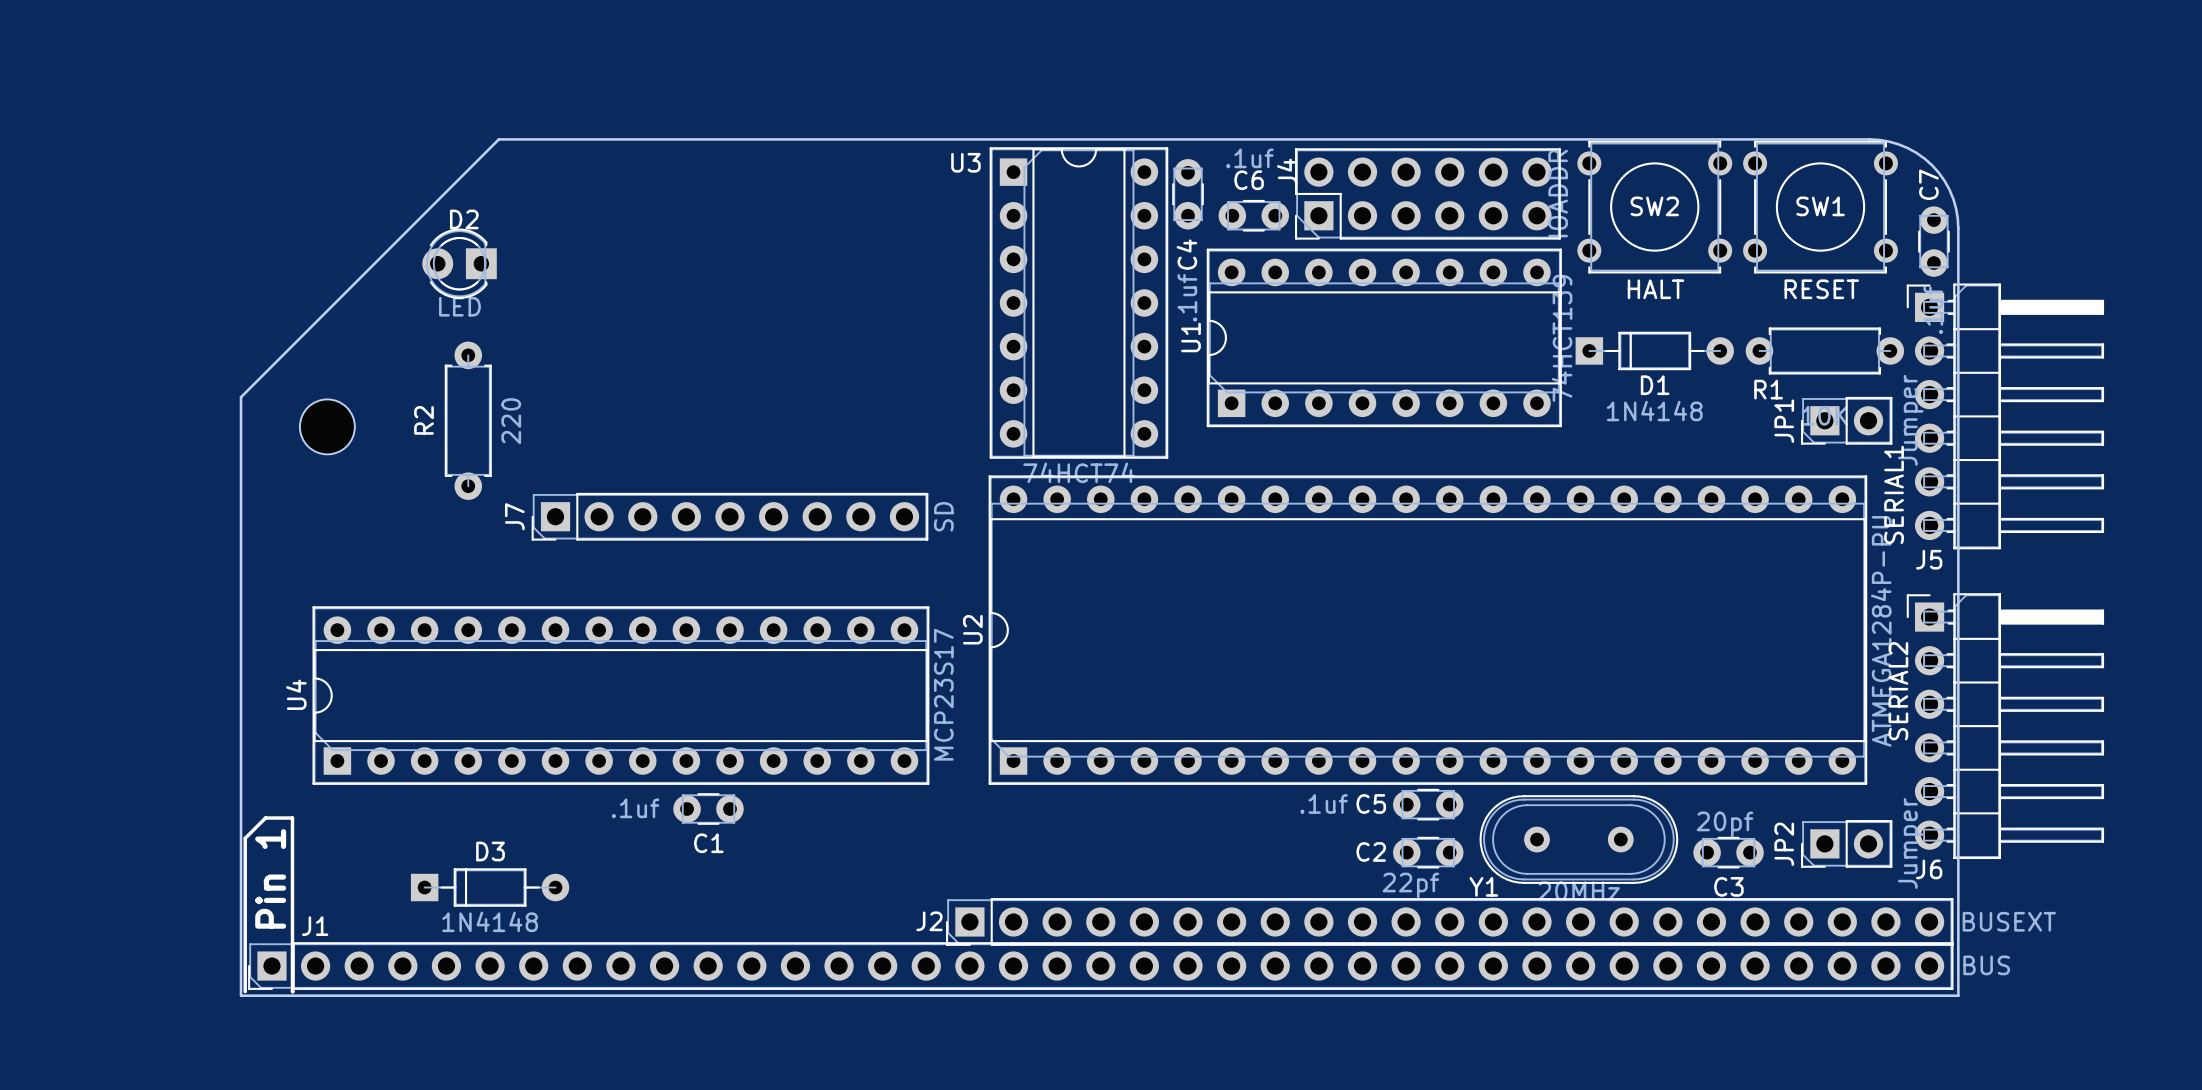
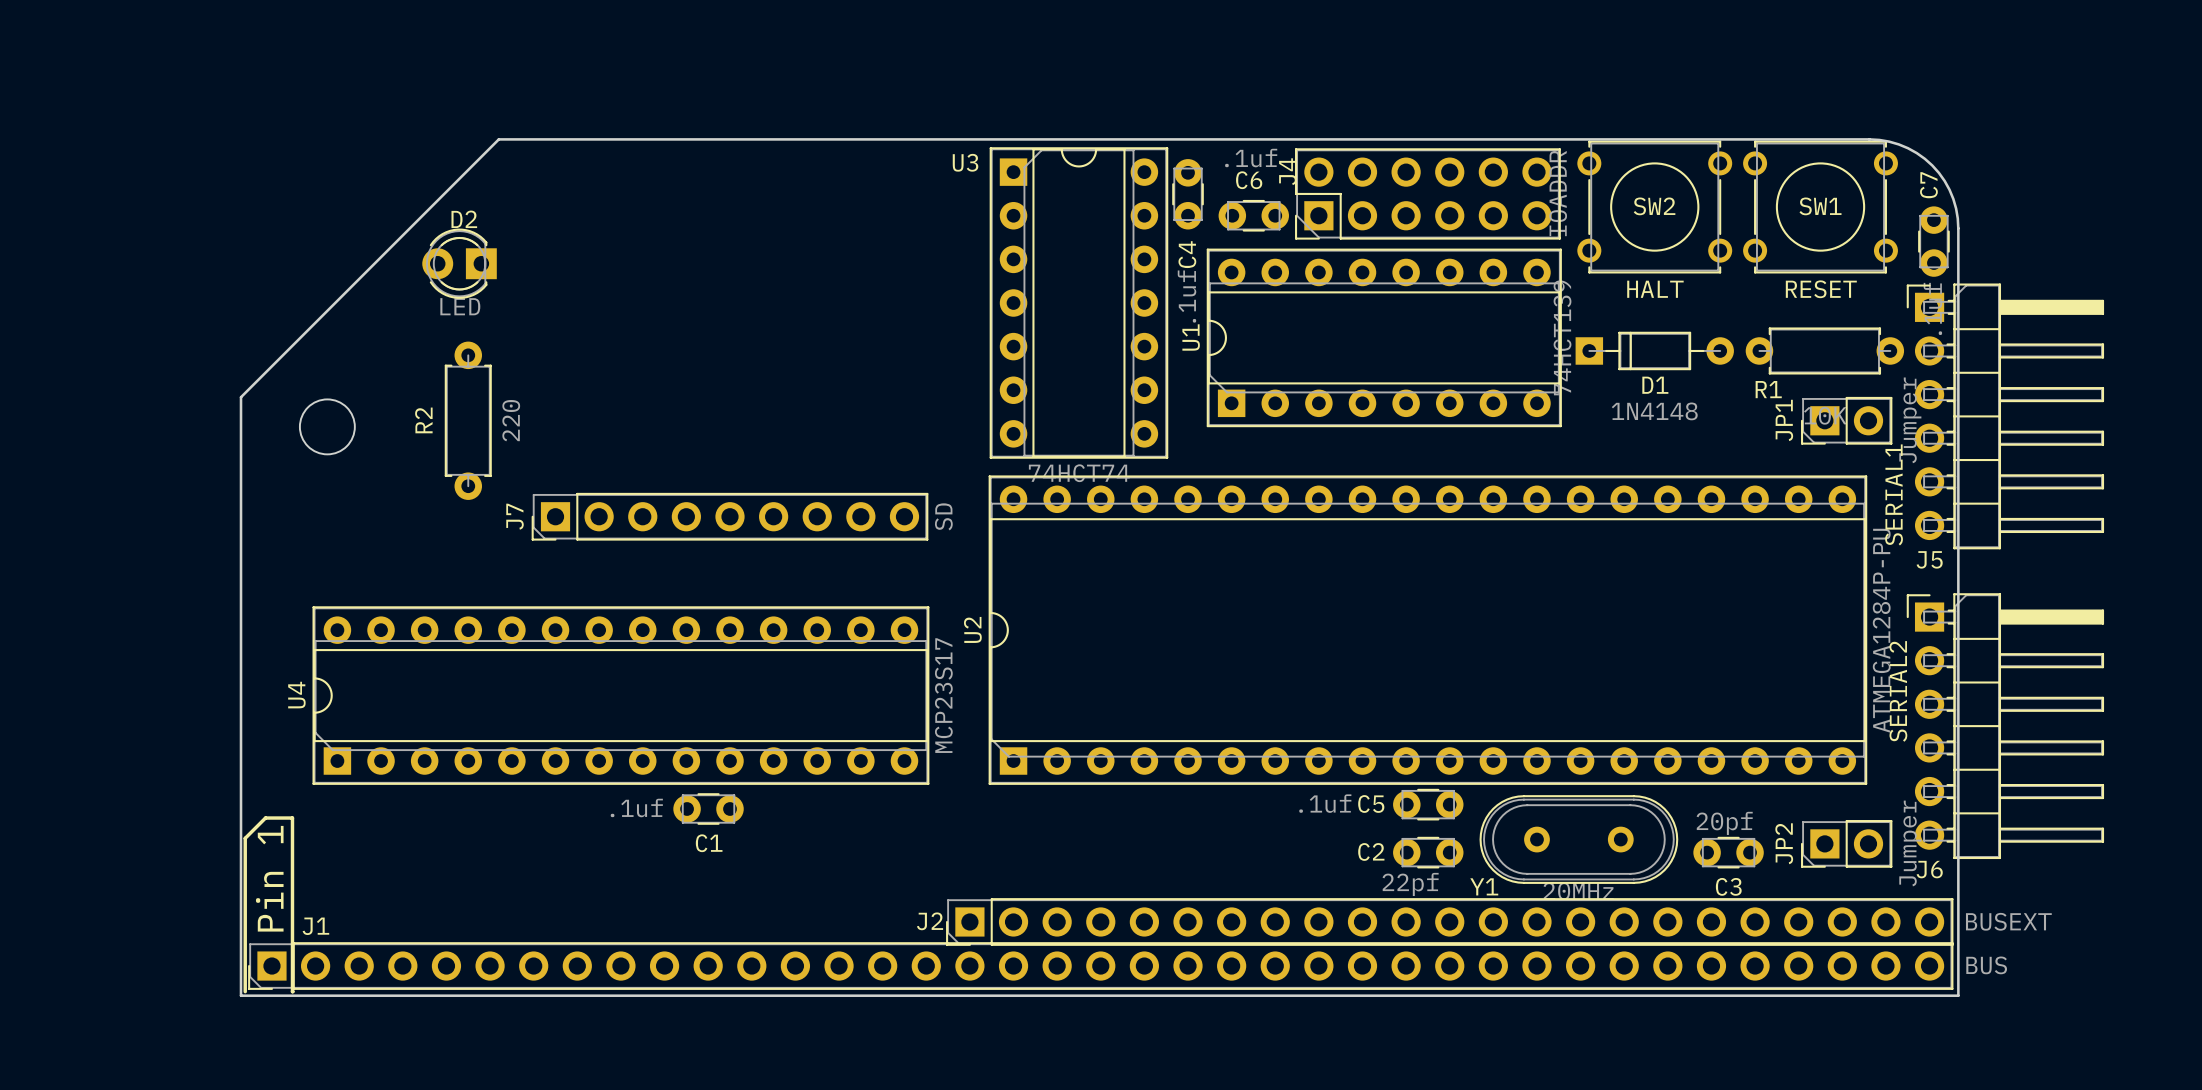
D3: 1N4148 (490, 887) -> none

